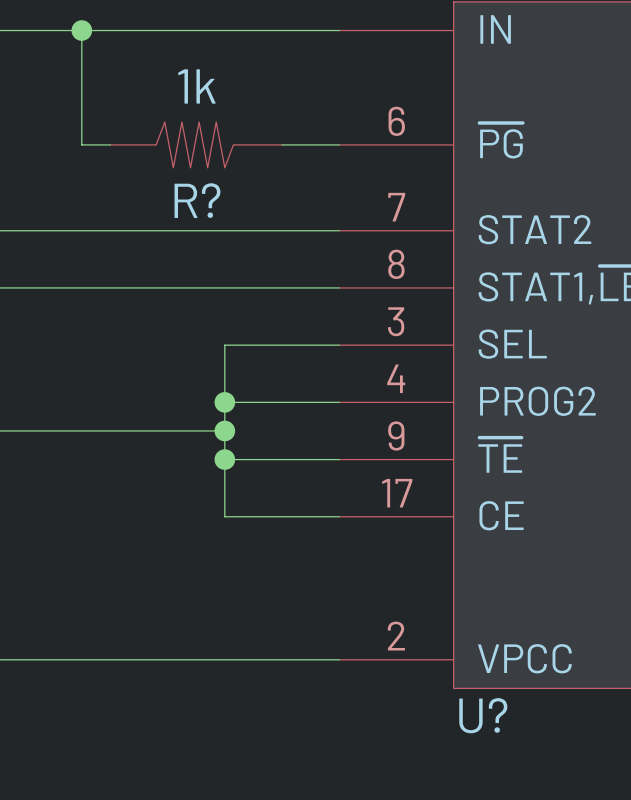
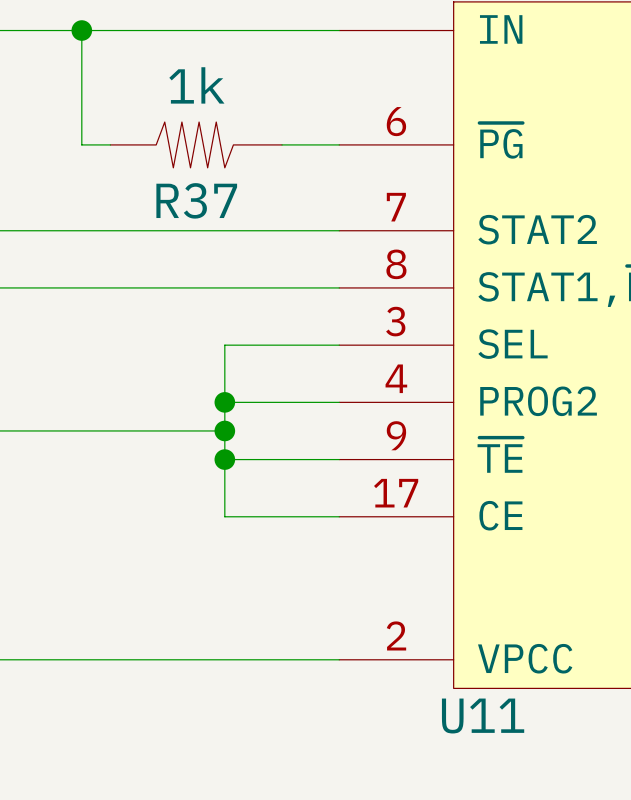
R? name: R? (197, 200) -> R37 (196, 200)
U? name: U? (483, 715) -> U11 (483, 716)

